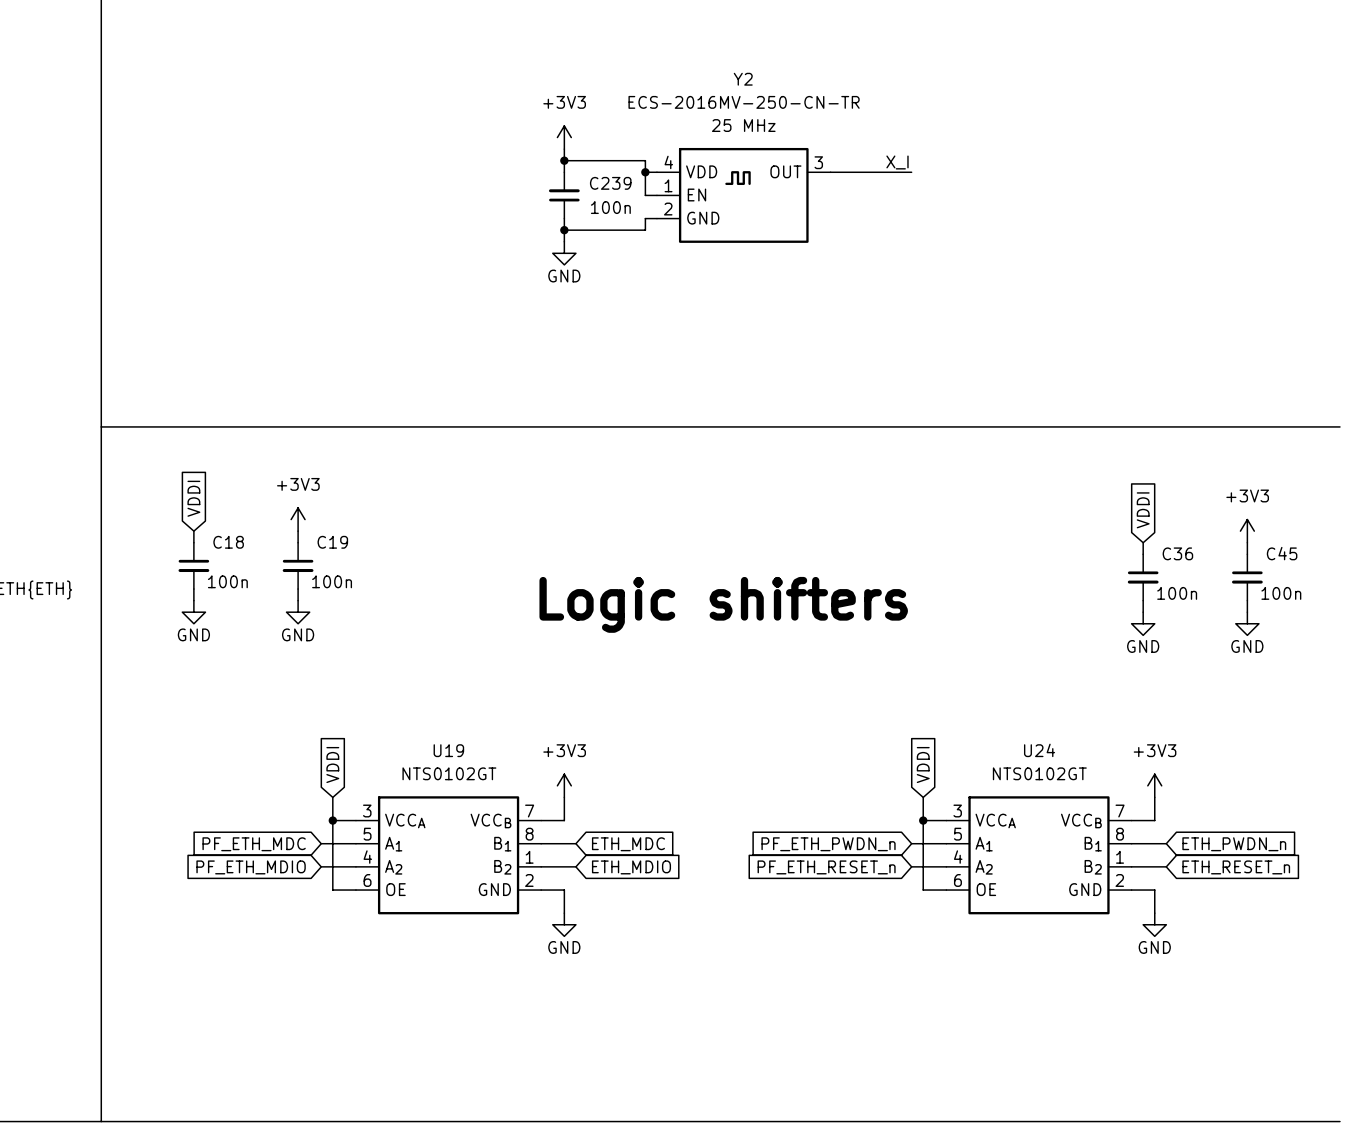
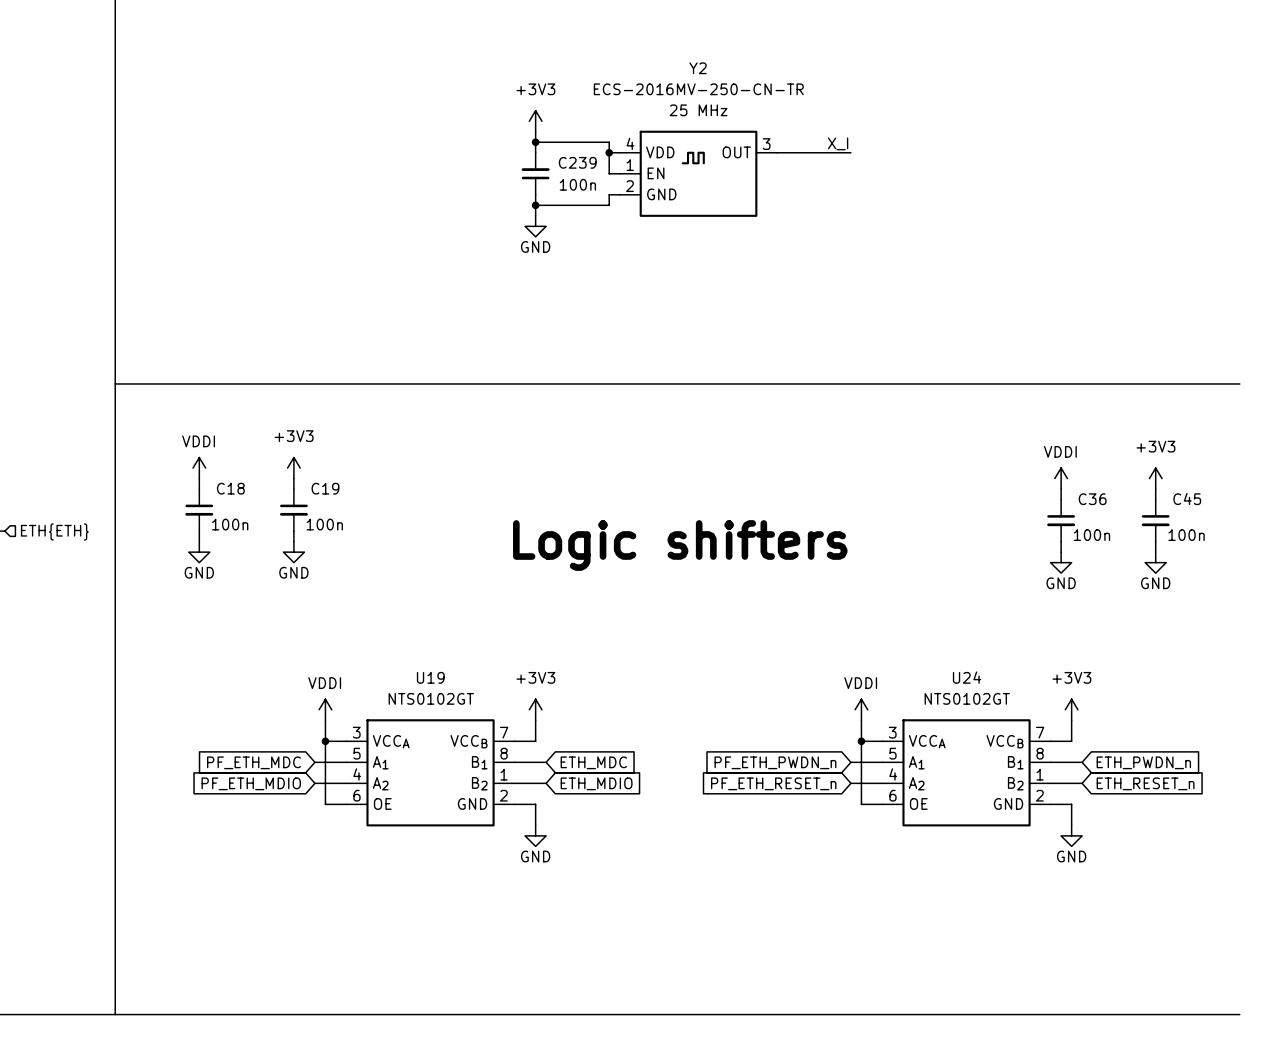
global label: VDDI (193, 498) -> none
global label: VDDI (1143, 510) -> none
power symbol: none -> VDDI (199, 468)
power symbol: none -> VDDI (1061, 478)
global label: VDDI (332, 765) -> none
global label: VDDI (923, 765) -> none
power symbol: none -> VDDI (325, 709)
power symbol: none -> VDDI (861, 709)

